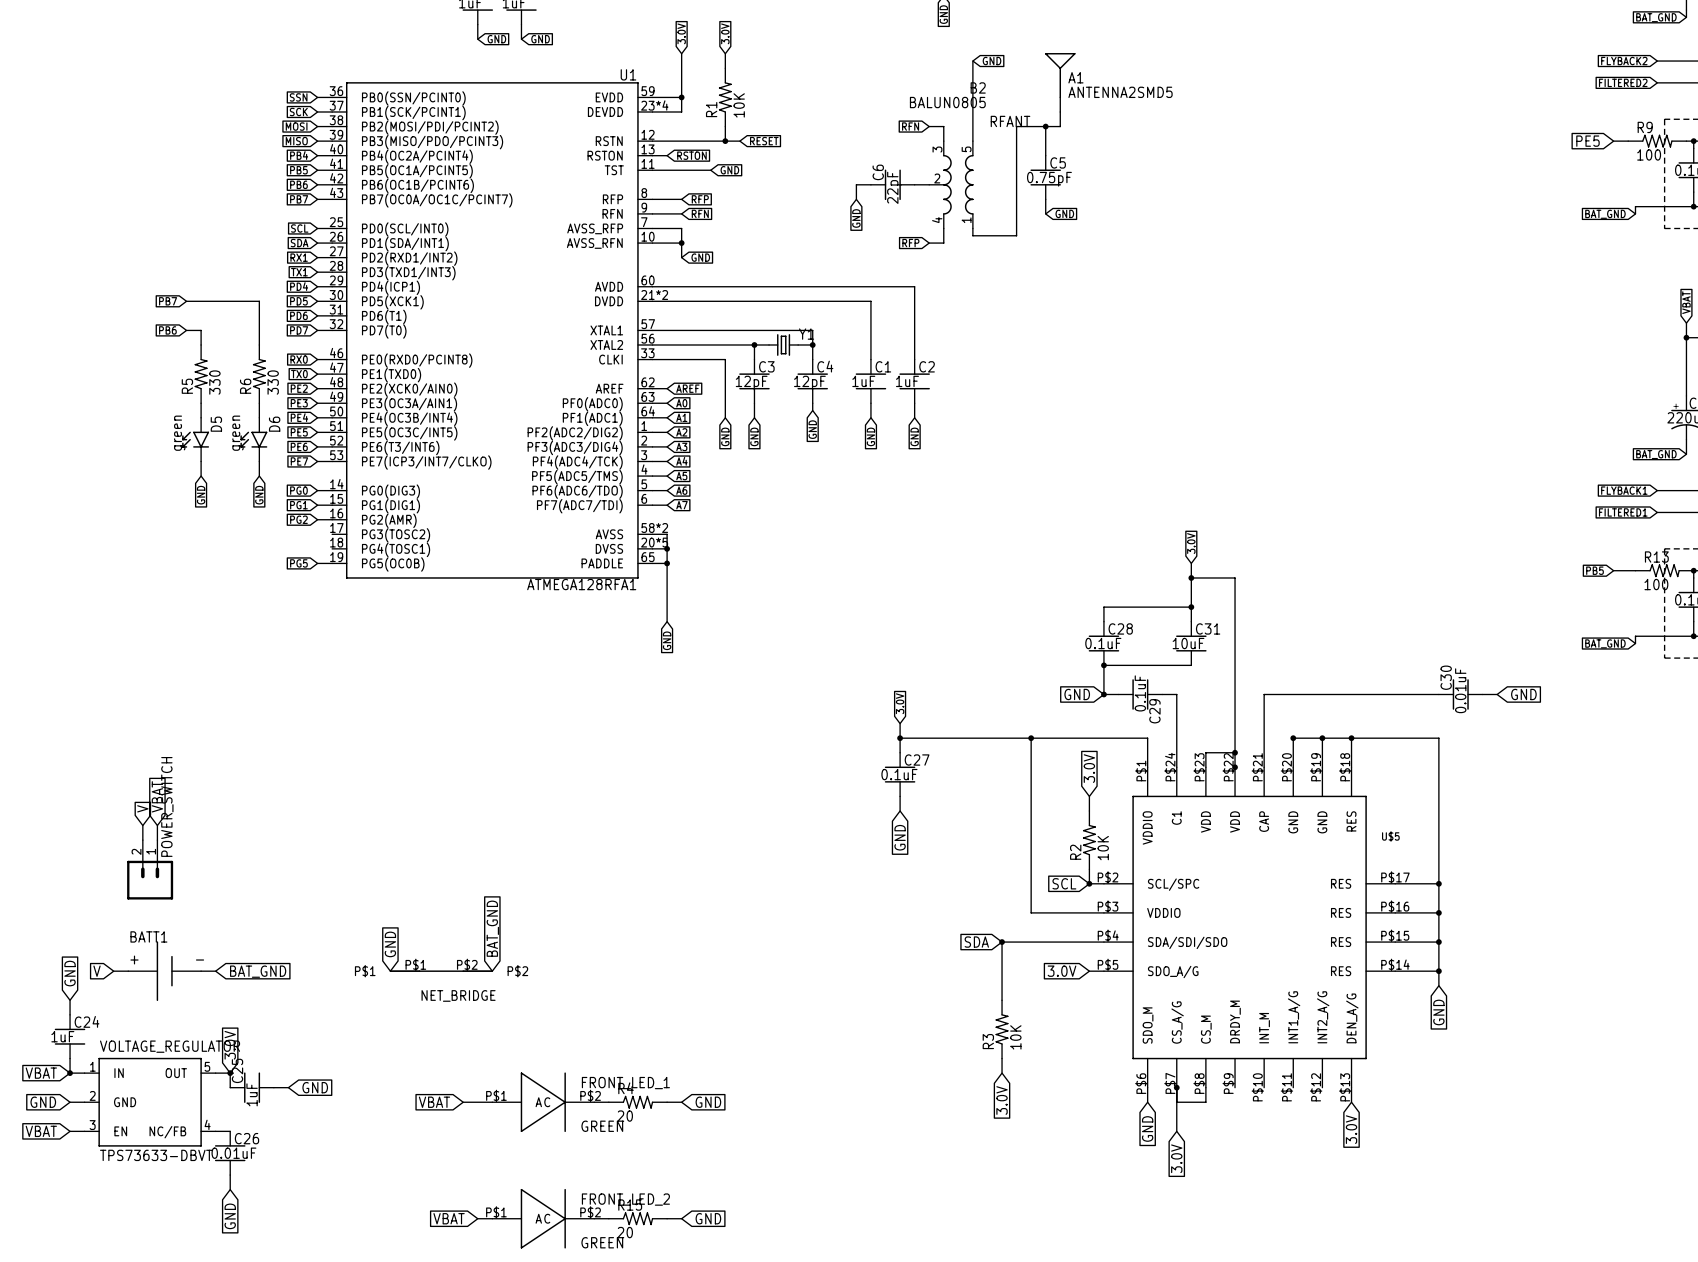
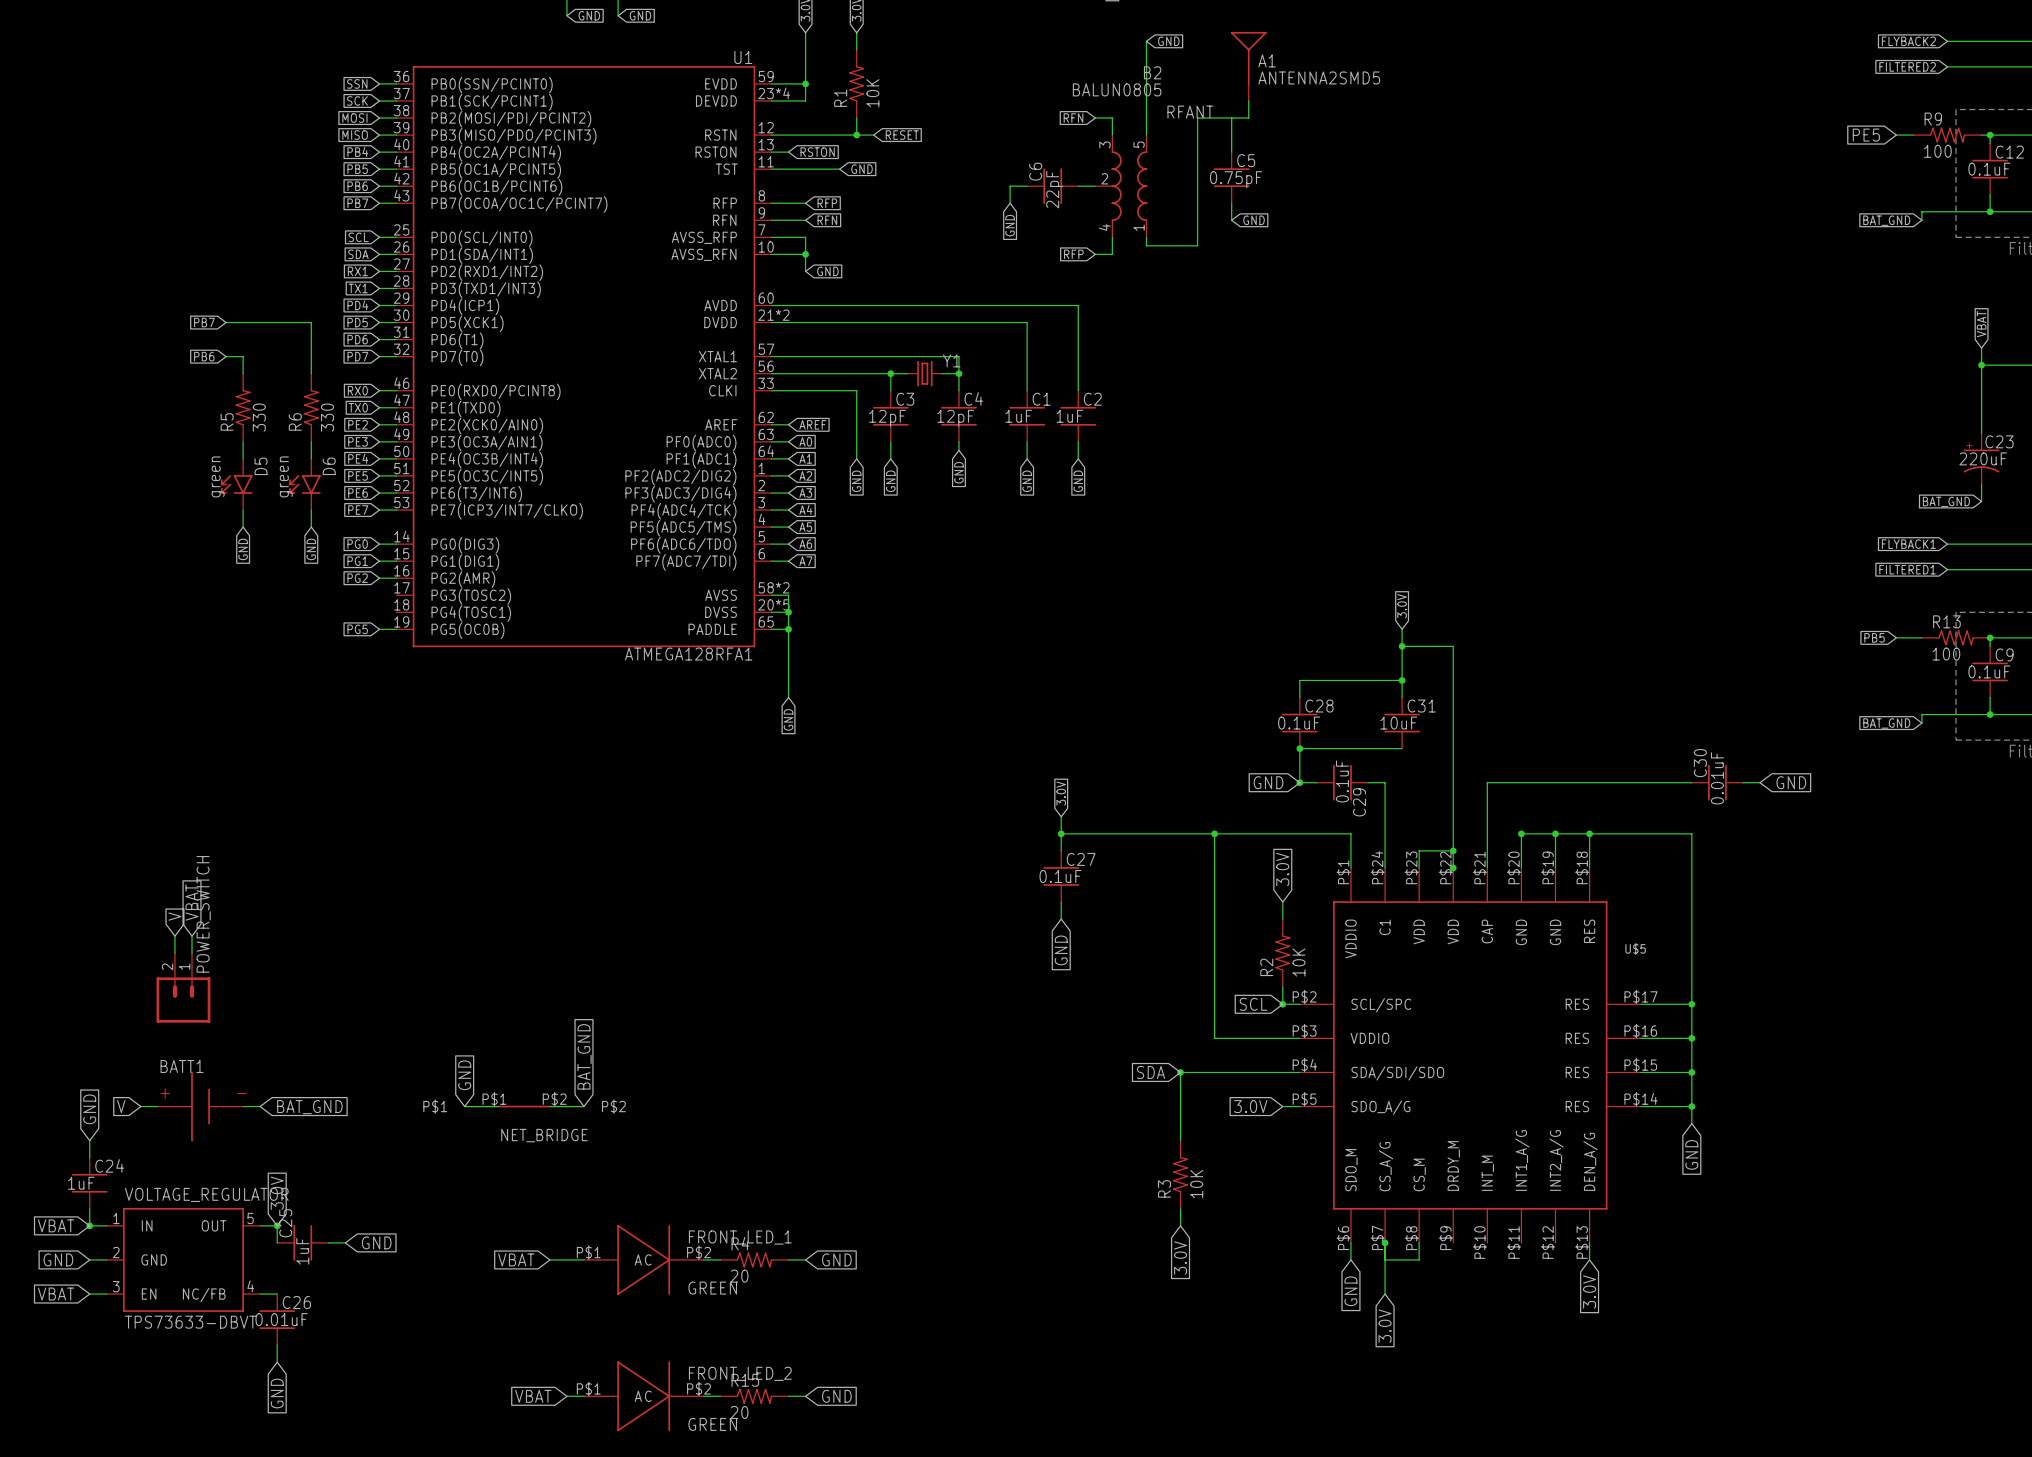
junction: (1045, 126) -> none

